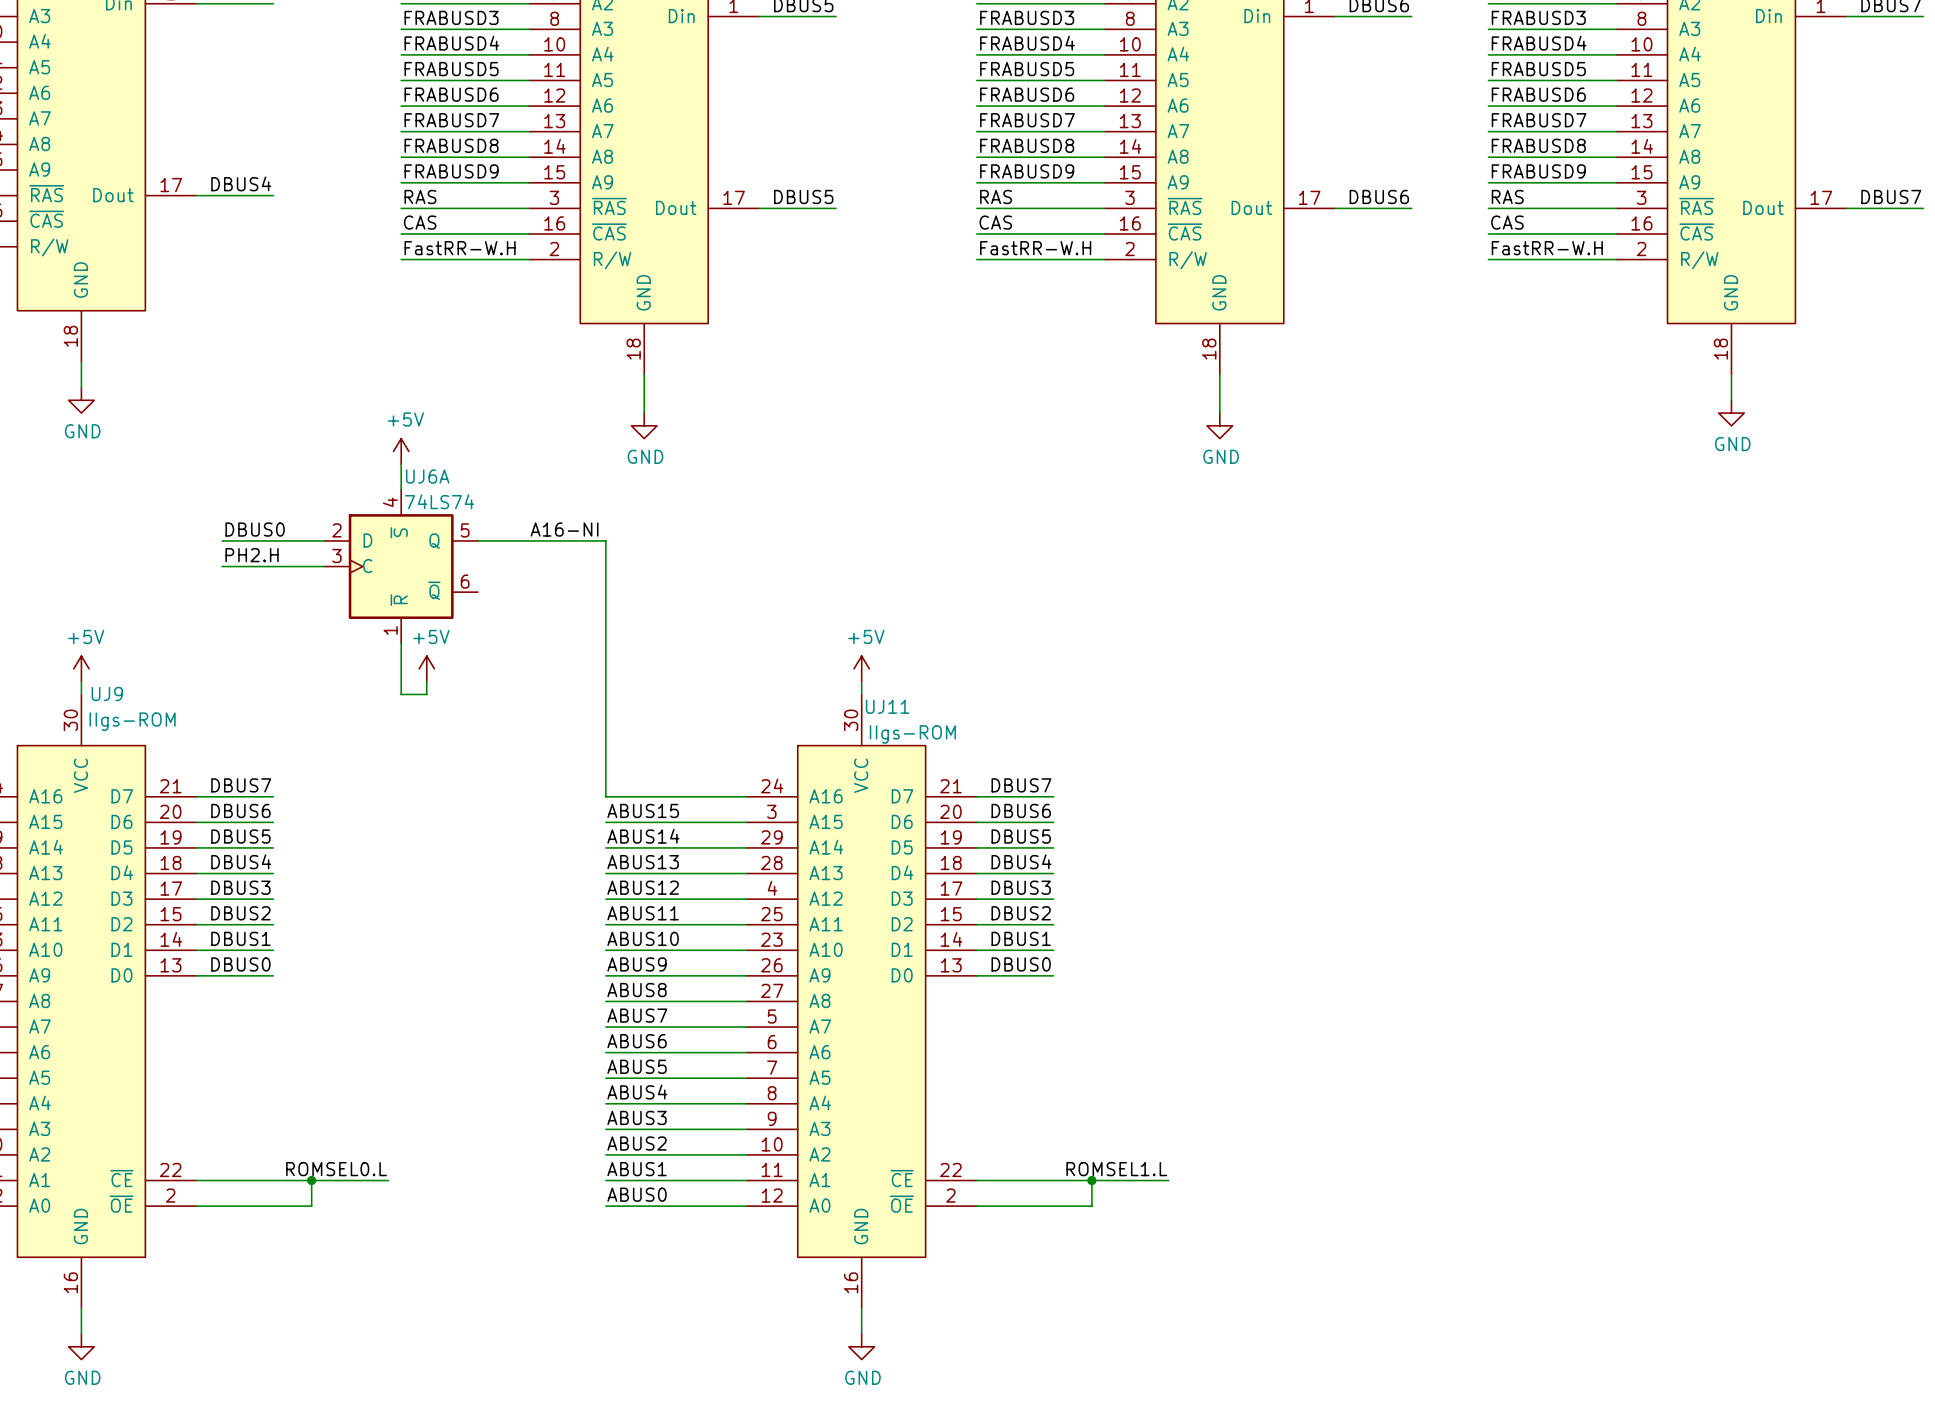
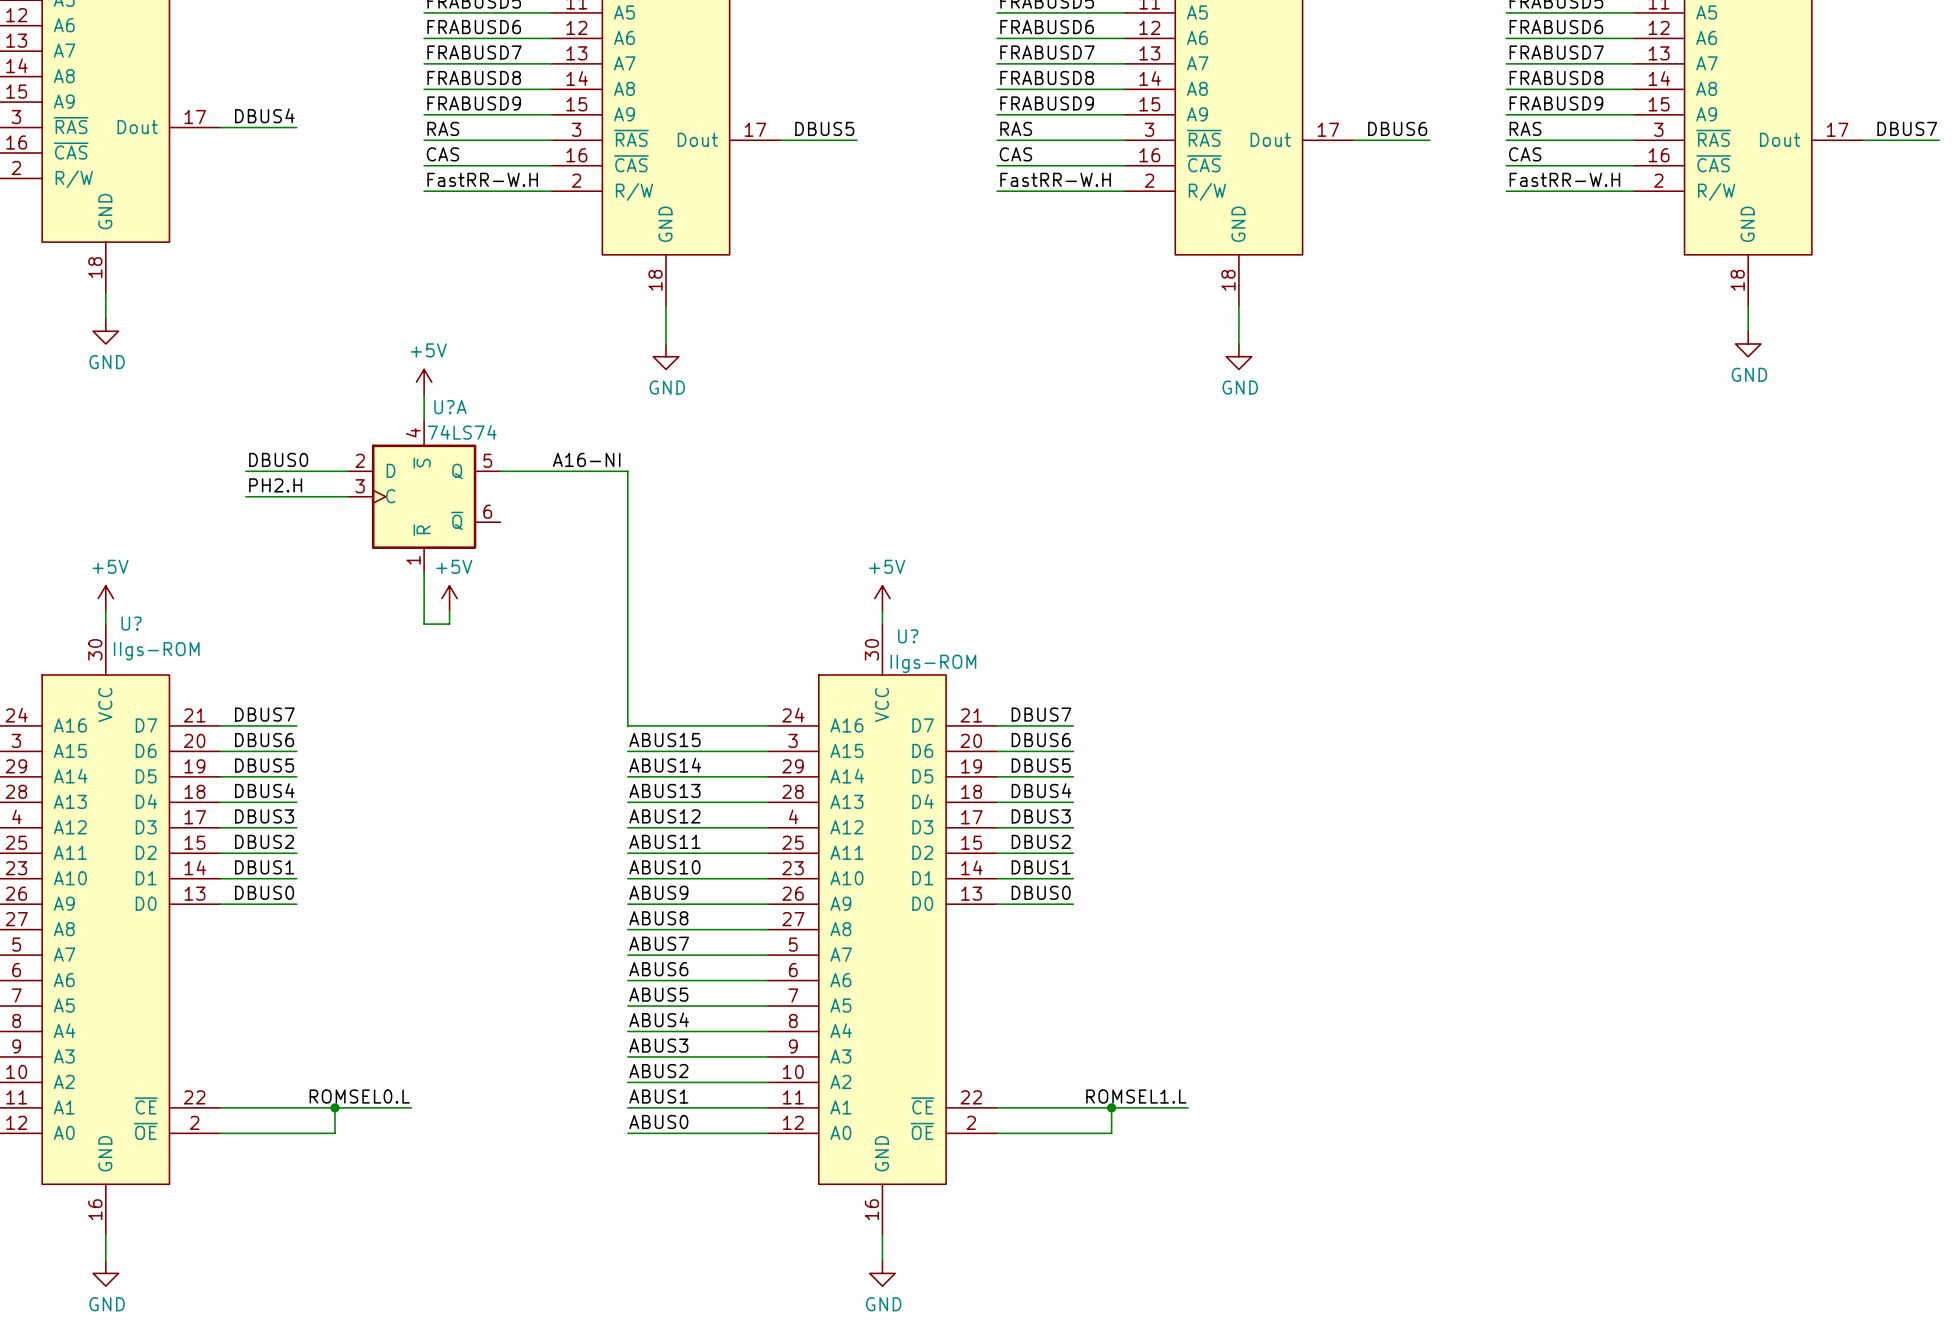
UJ6A name: UJ6A (427, 476) -> U?A (450, 407)
UJ9 name: UJ9 (107, 693) -> U? (131, 623)
UJ11 name: UJ11 (887, 706) -> U? (908, 636)

